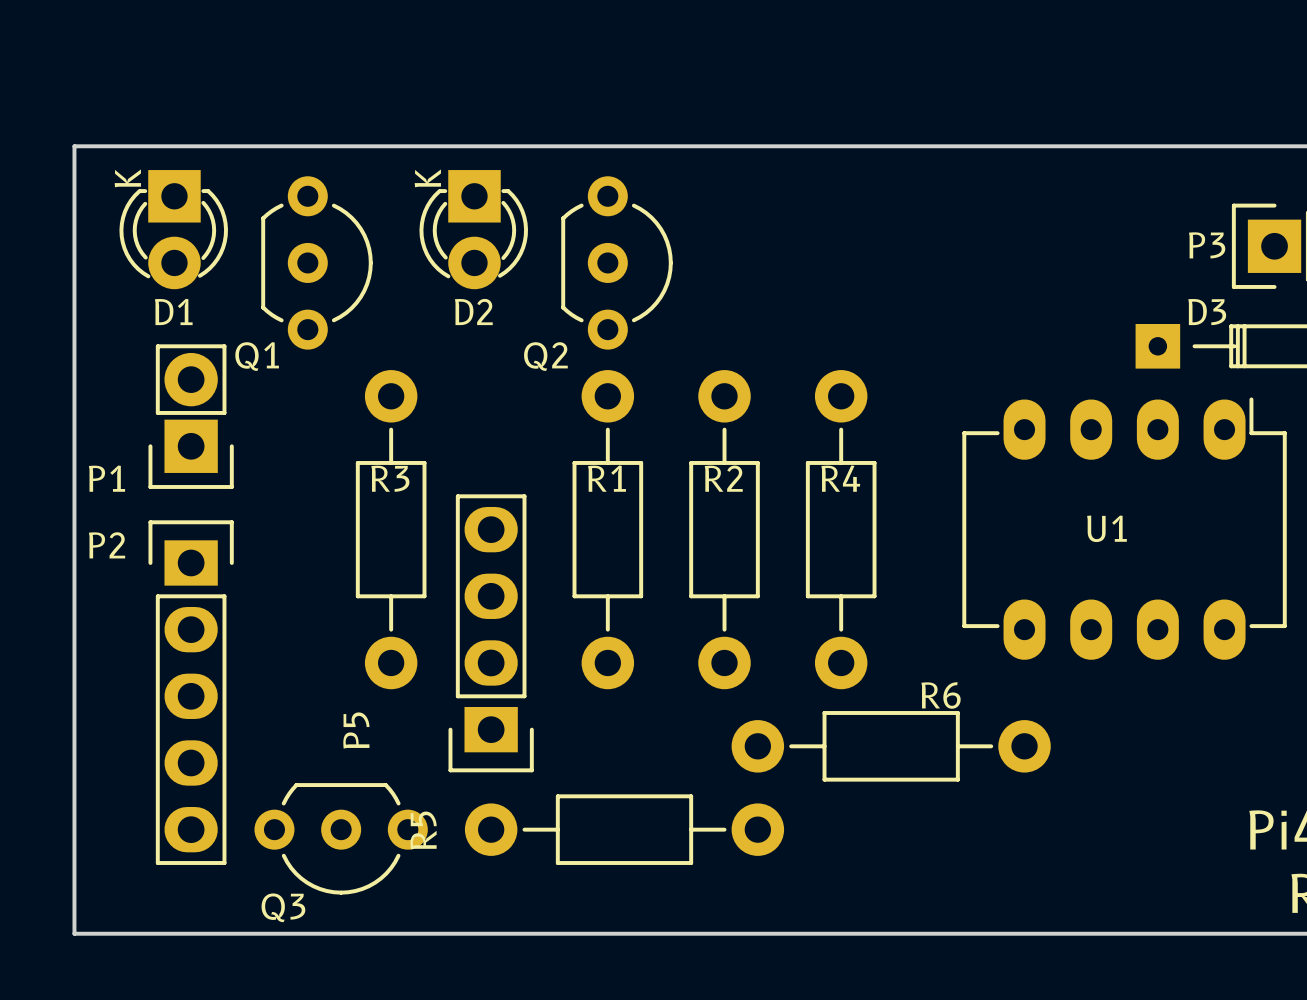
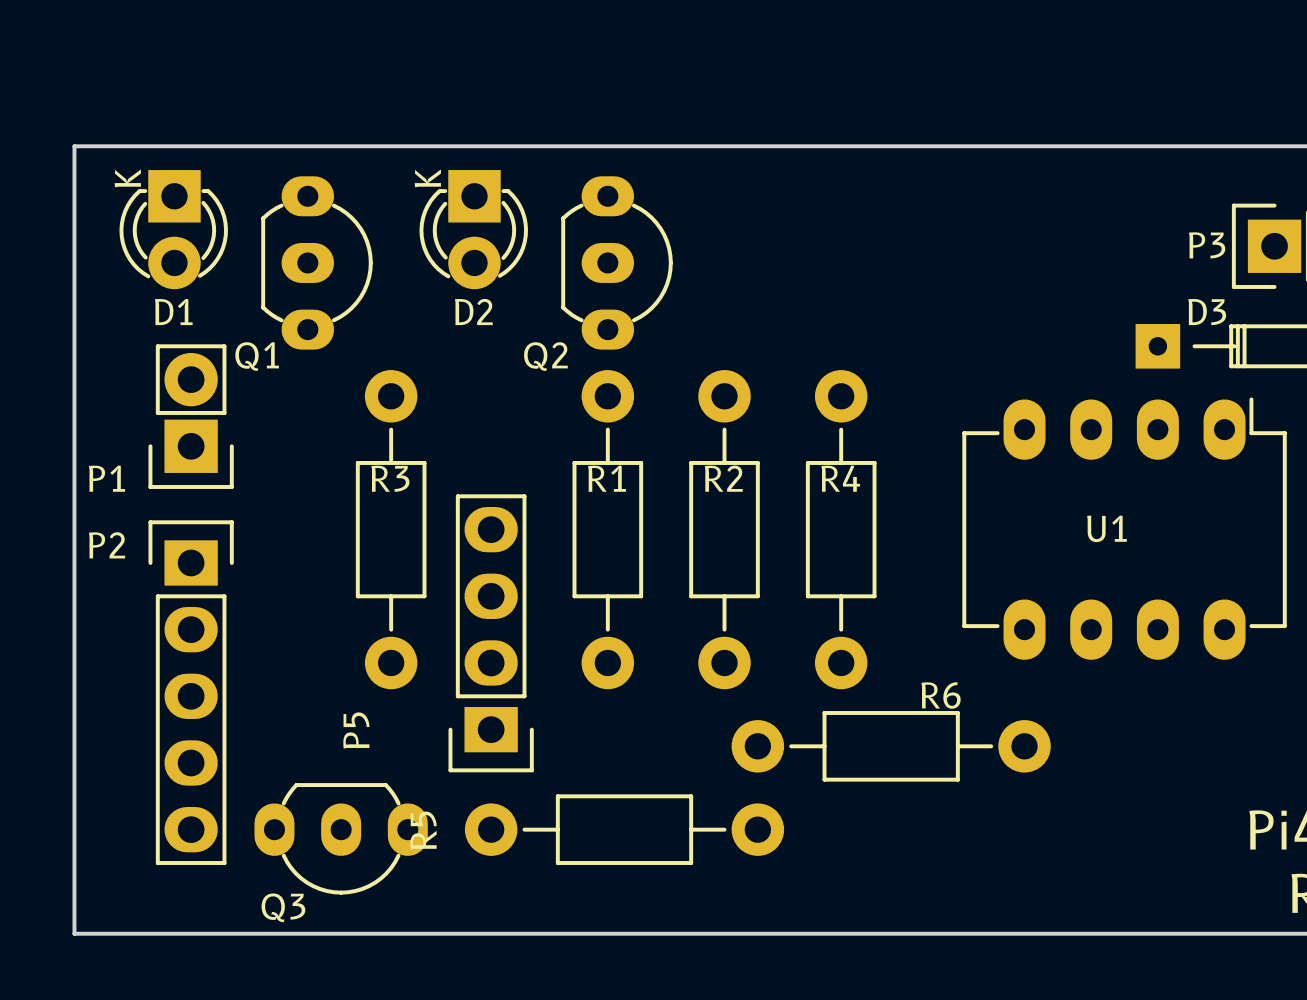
Q1 footprint: [261, 176, 373, 350] -> [261, 176, 373, 350]
Q2 footprint: [561, 176, 673, 350] -> [561, 176, 673, 350]
Q3 footprint: [254, 783, 428, 895] -> [254, 783, 428, 895]

